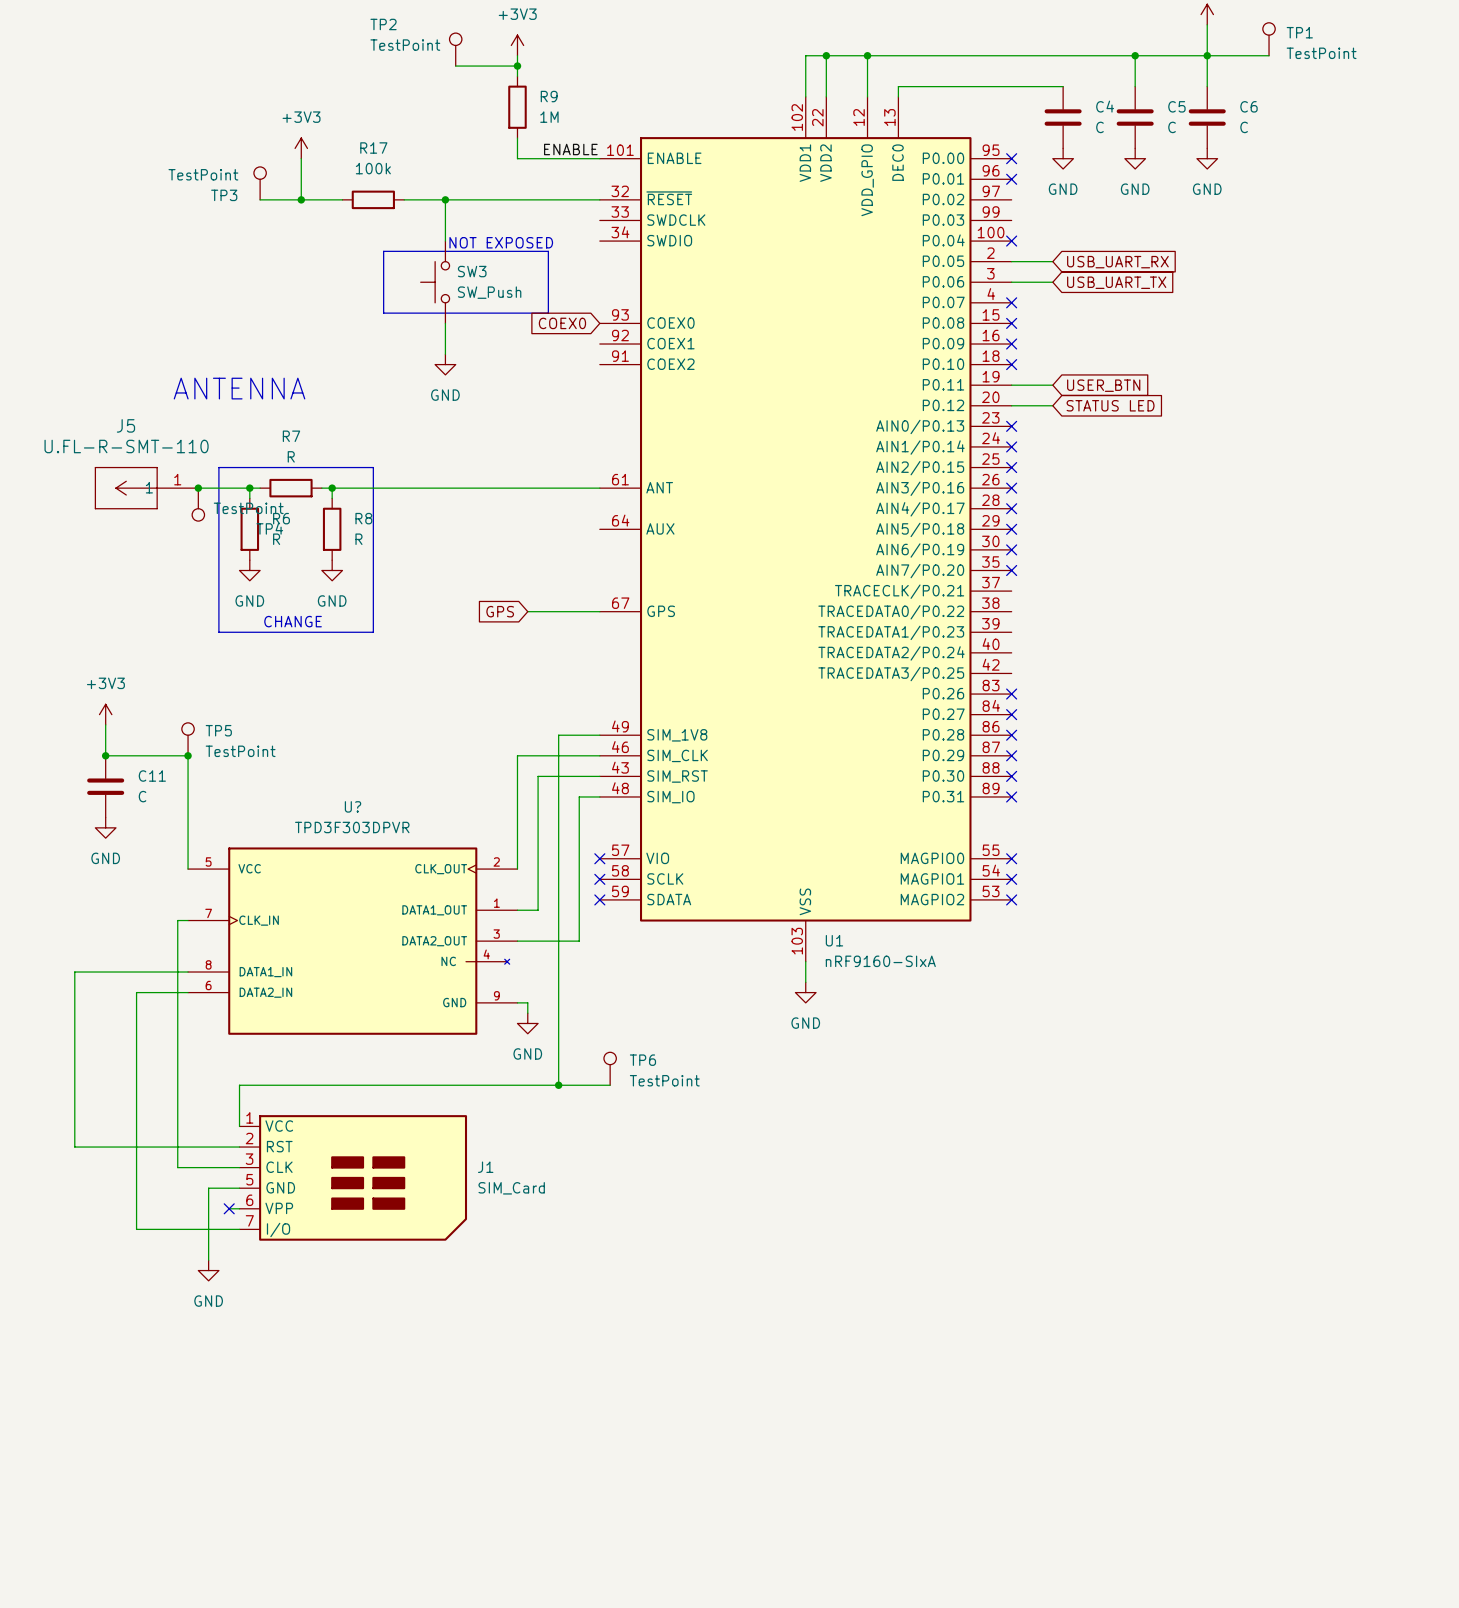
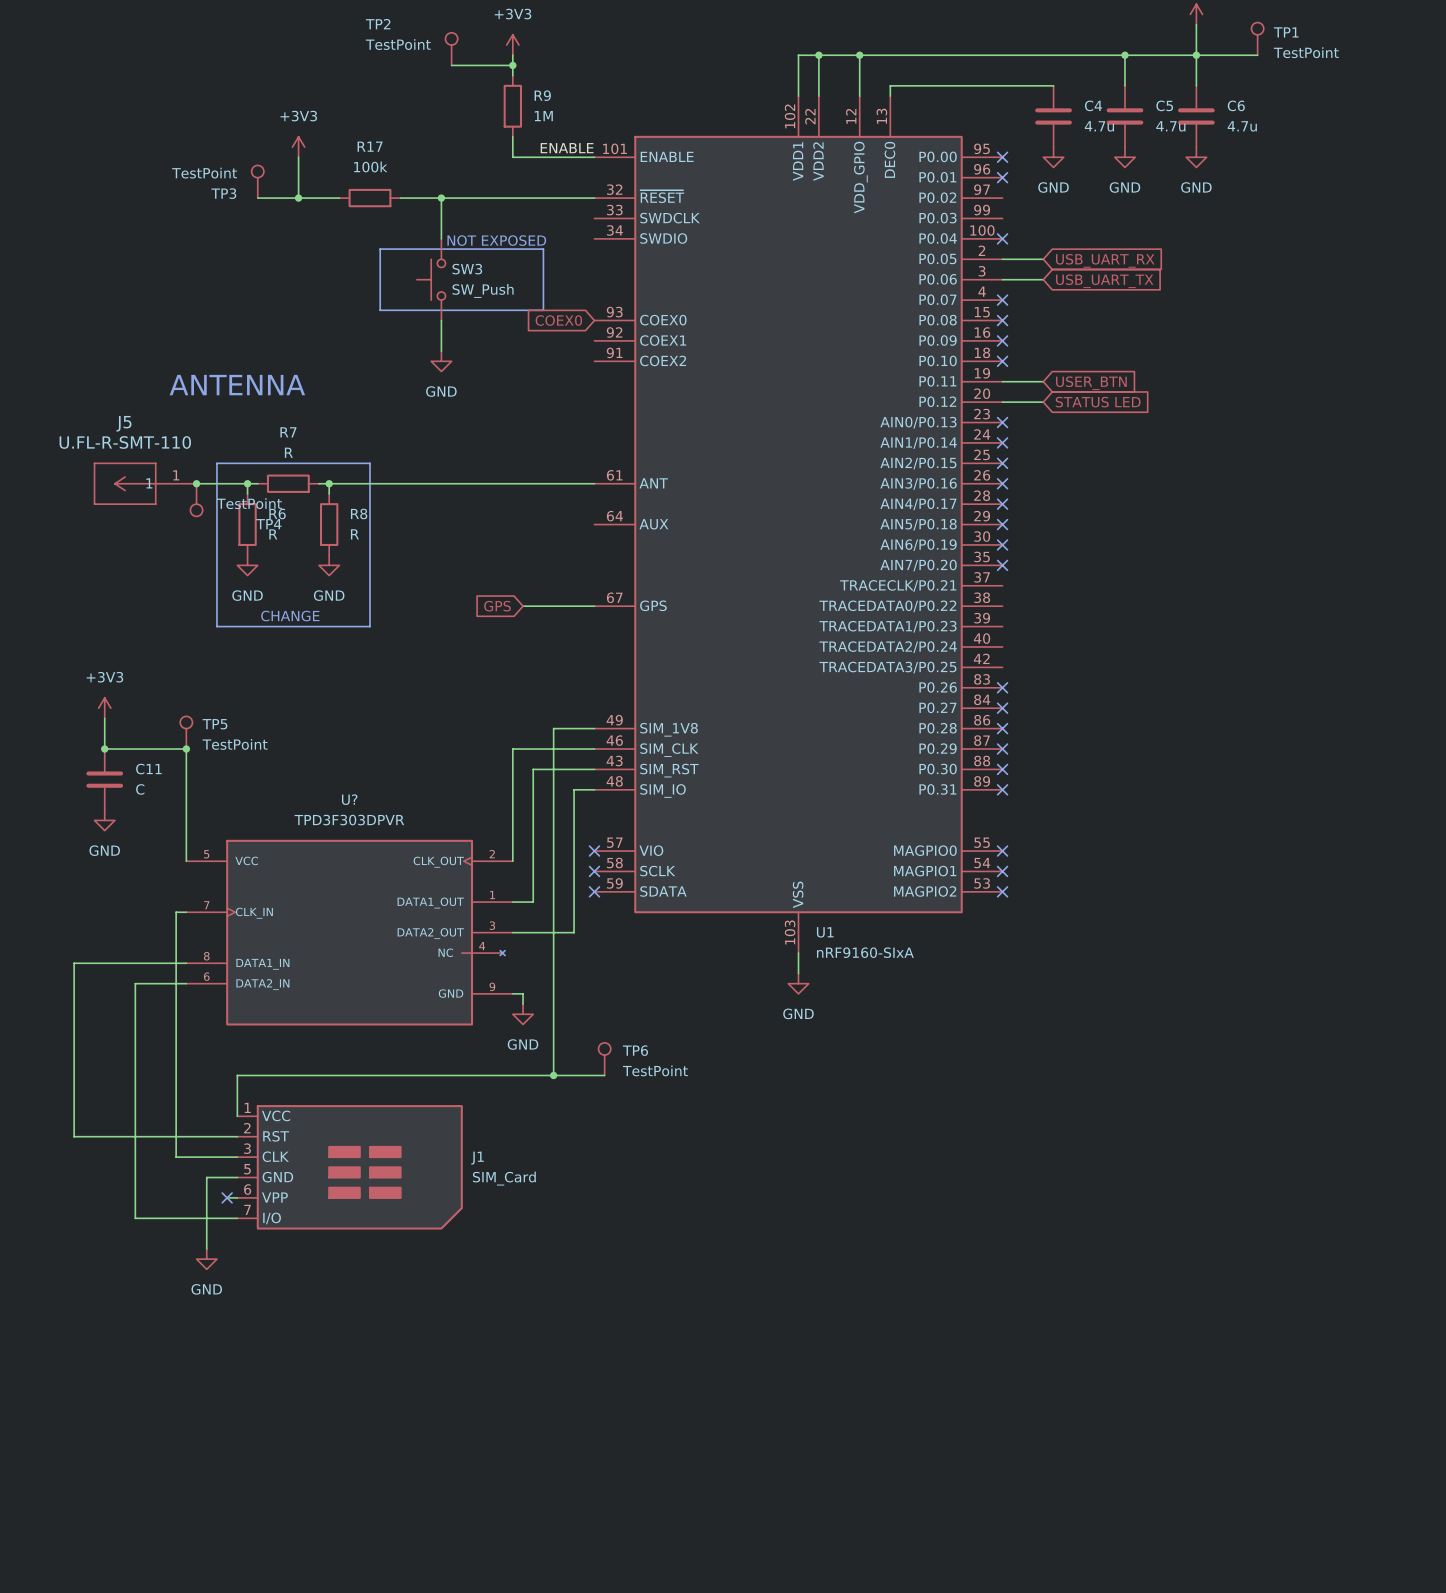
C4 value: C (1099, 127) -> 4.7u (1099, 126)
C5 value: C (1172, 127) -> 4.7u (1170, 126)
C6 value: C (1244, 127) -> 4.7u (1242, 126)

